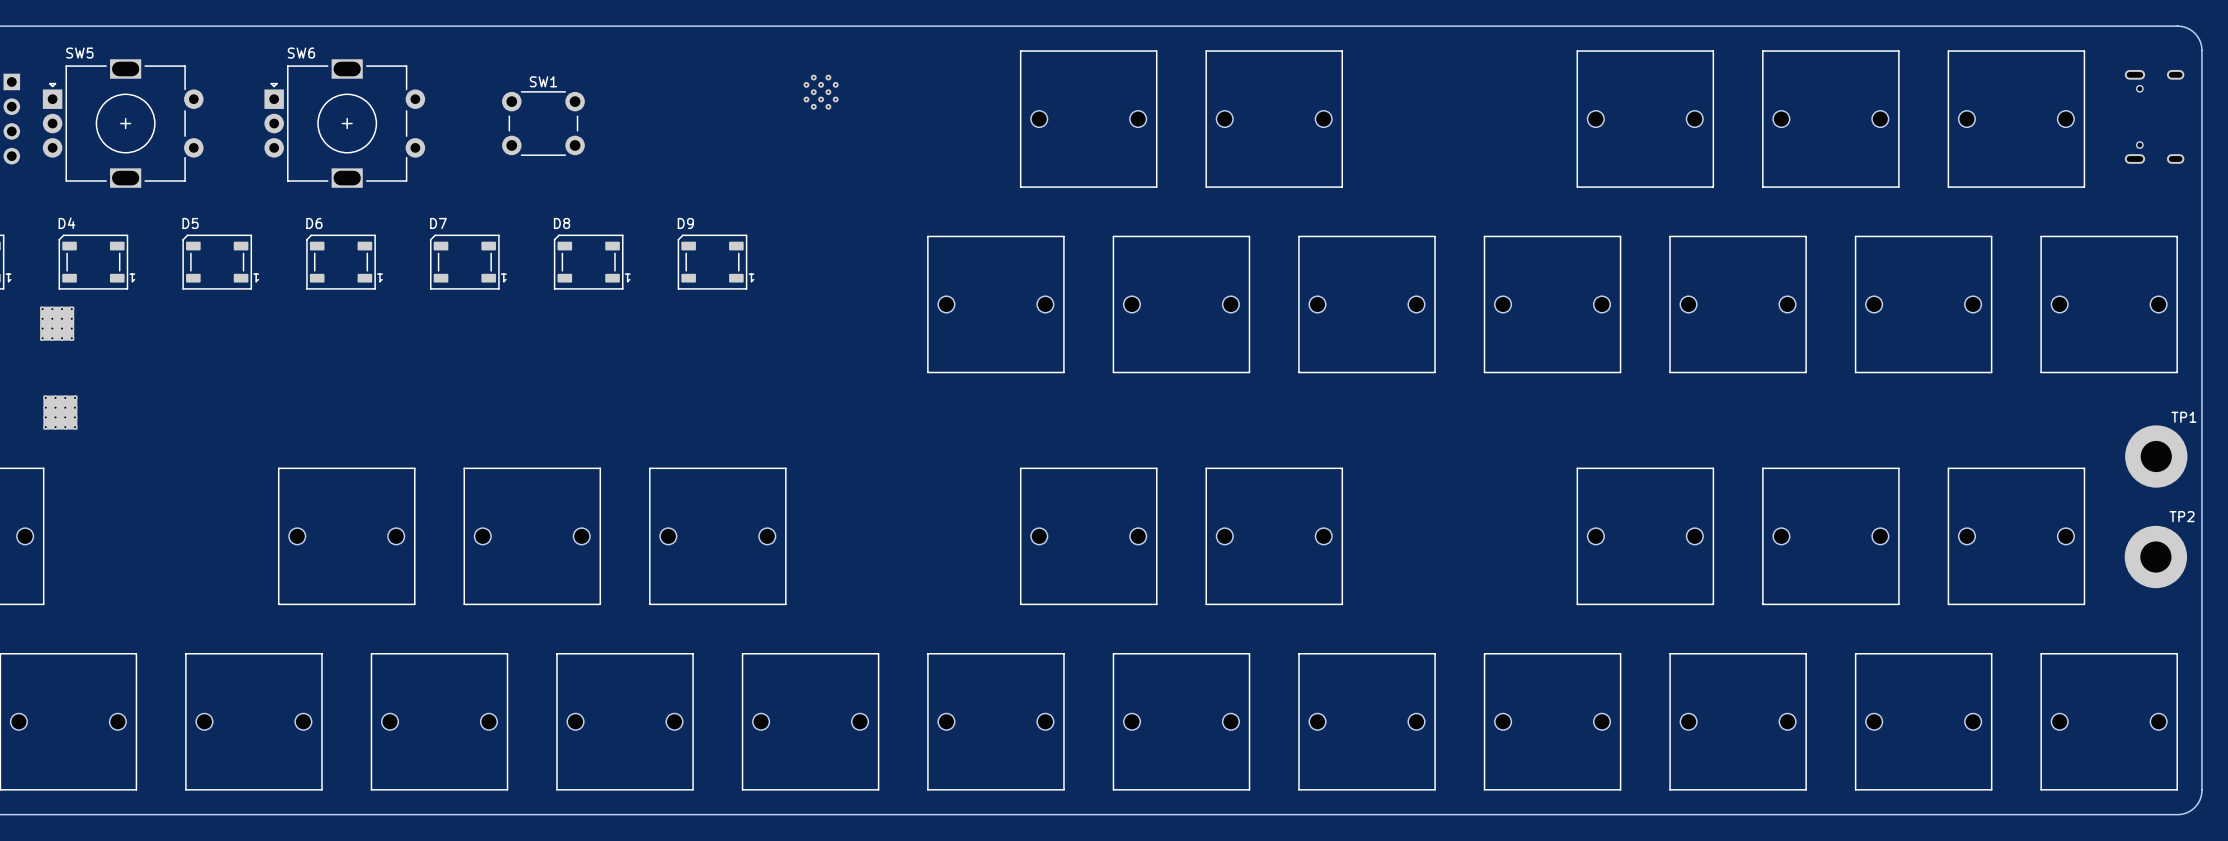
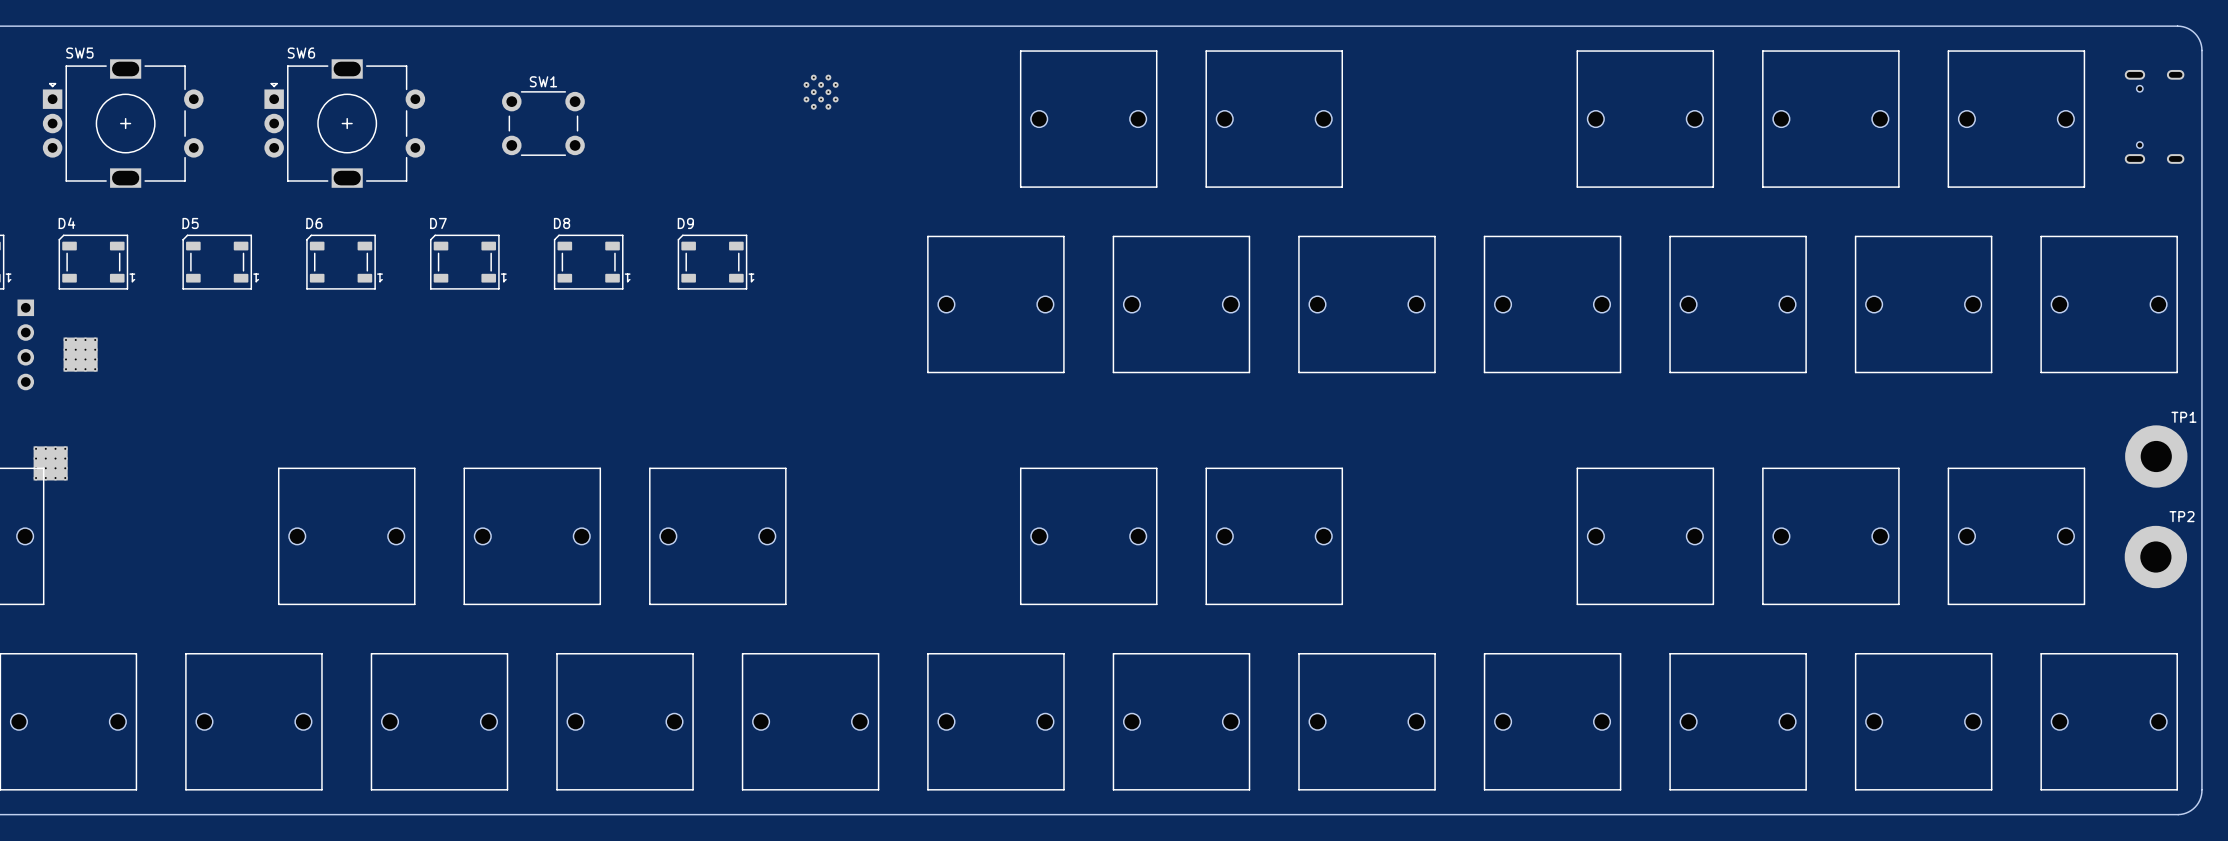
part: (11, 119) -> none
part: (57, 323) -> none
part: none -> (25, 344)
part: none -> (80, 354)
part: (60, 412) -> none
part: none -> (50, 463)

